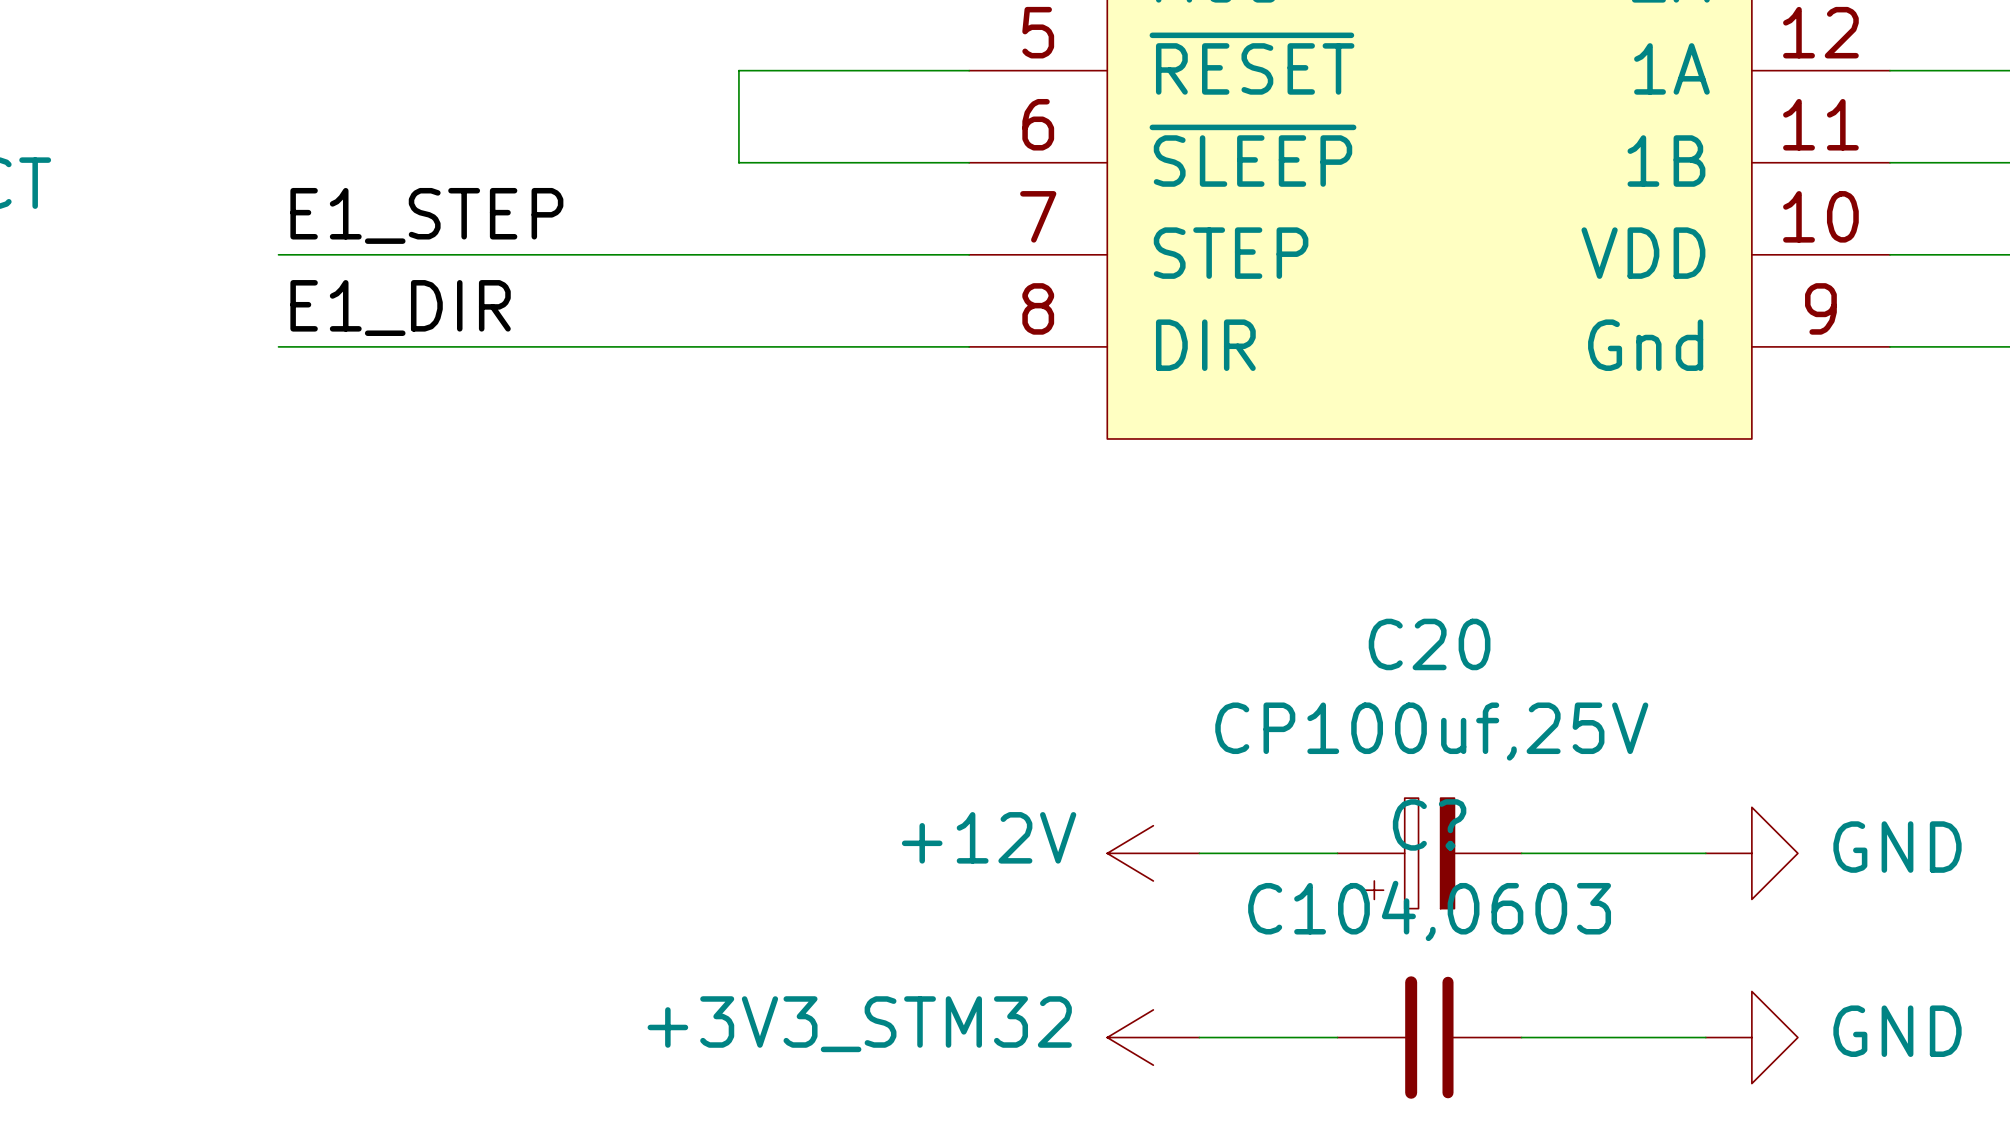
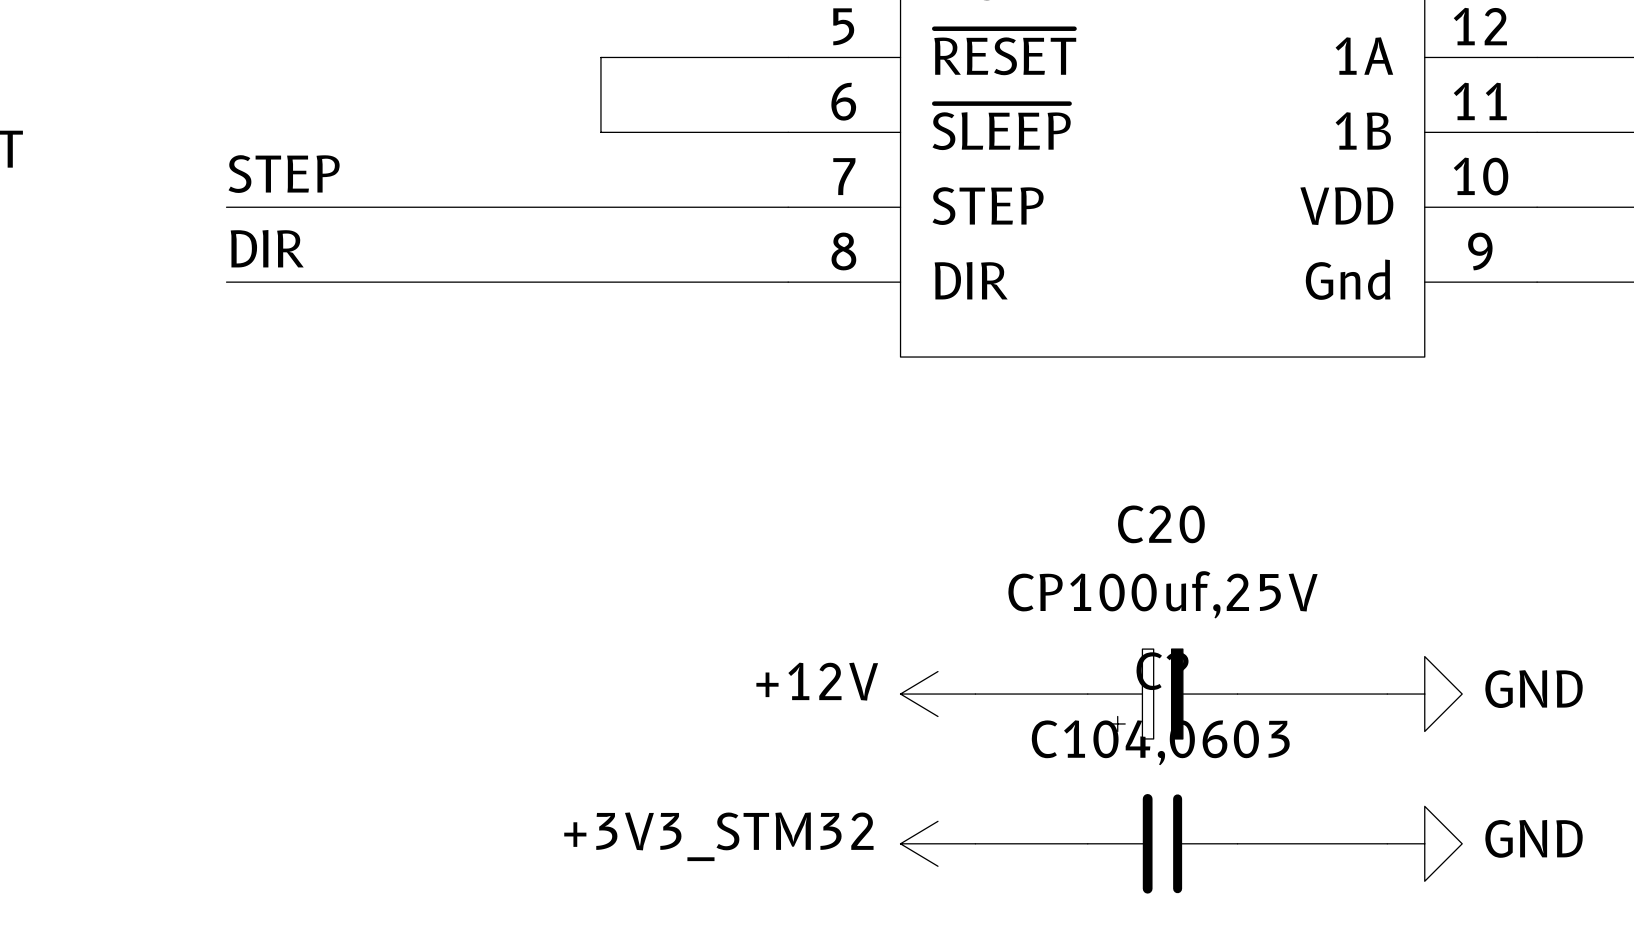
label: E1_STEP (426, 215) -> STEP (284, 174)
label: E1_DIR (400, 308) -> DIR (267, 248)

